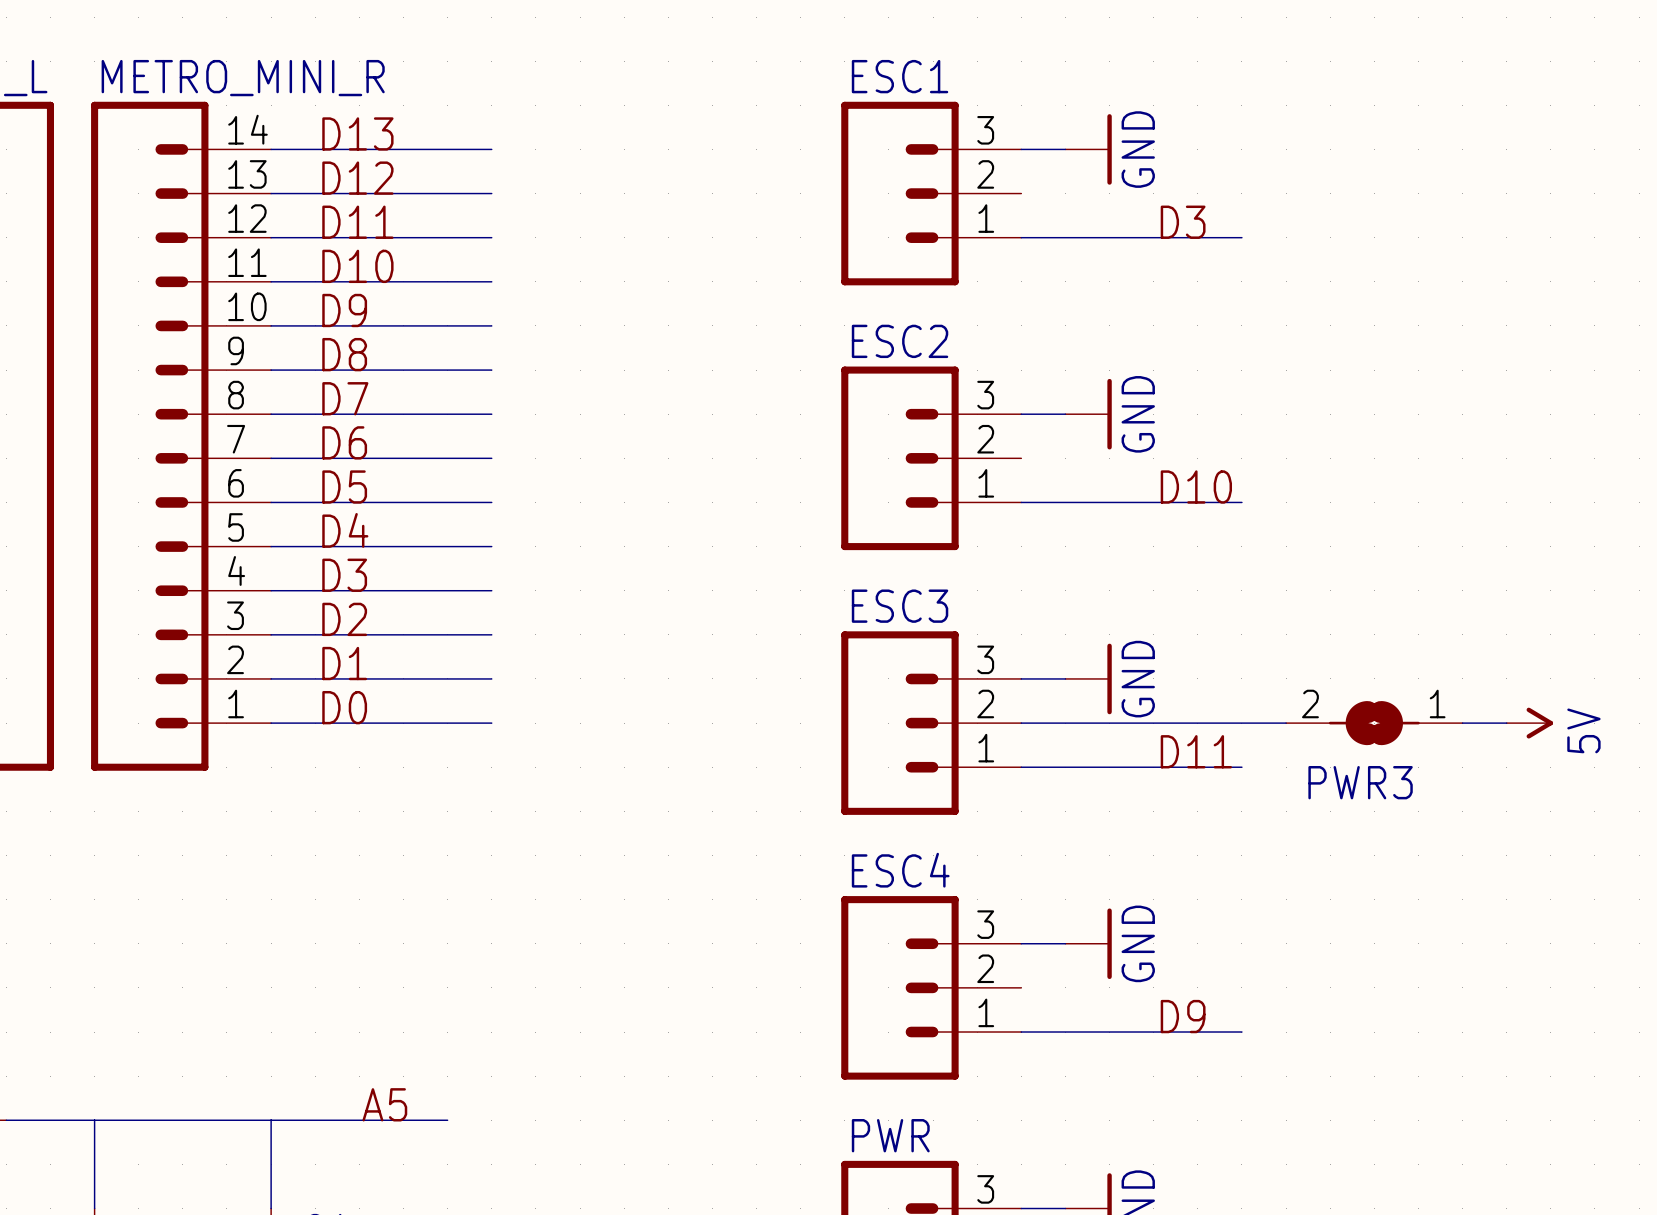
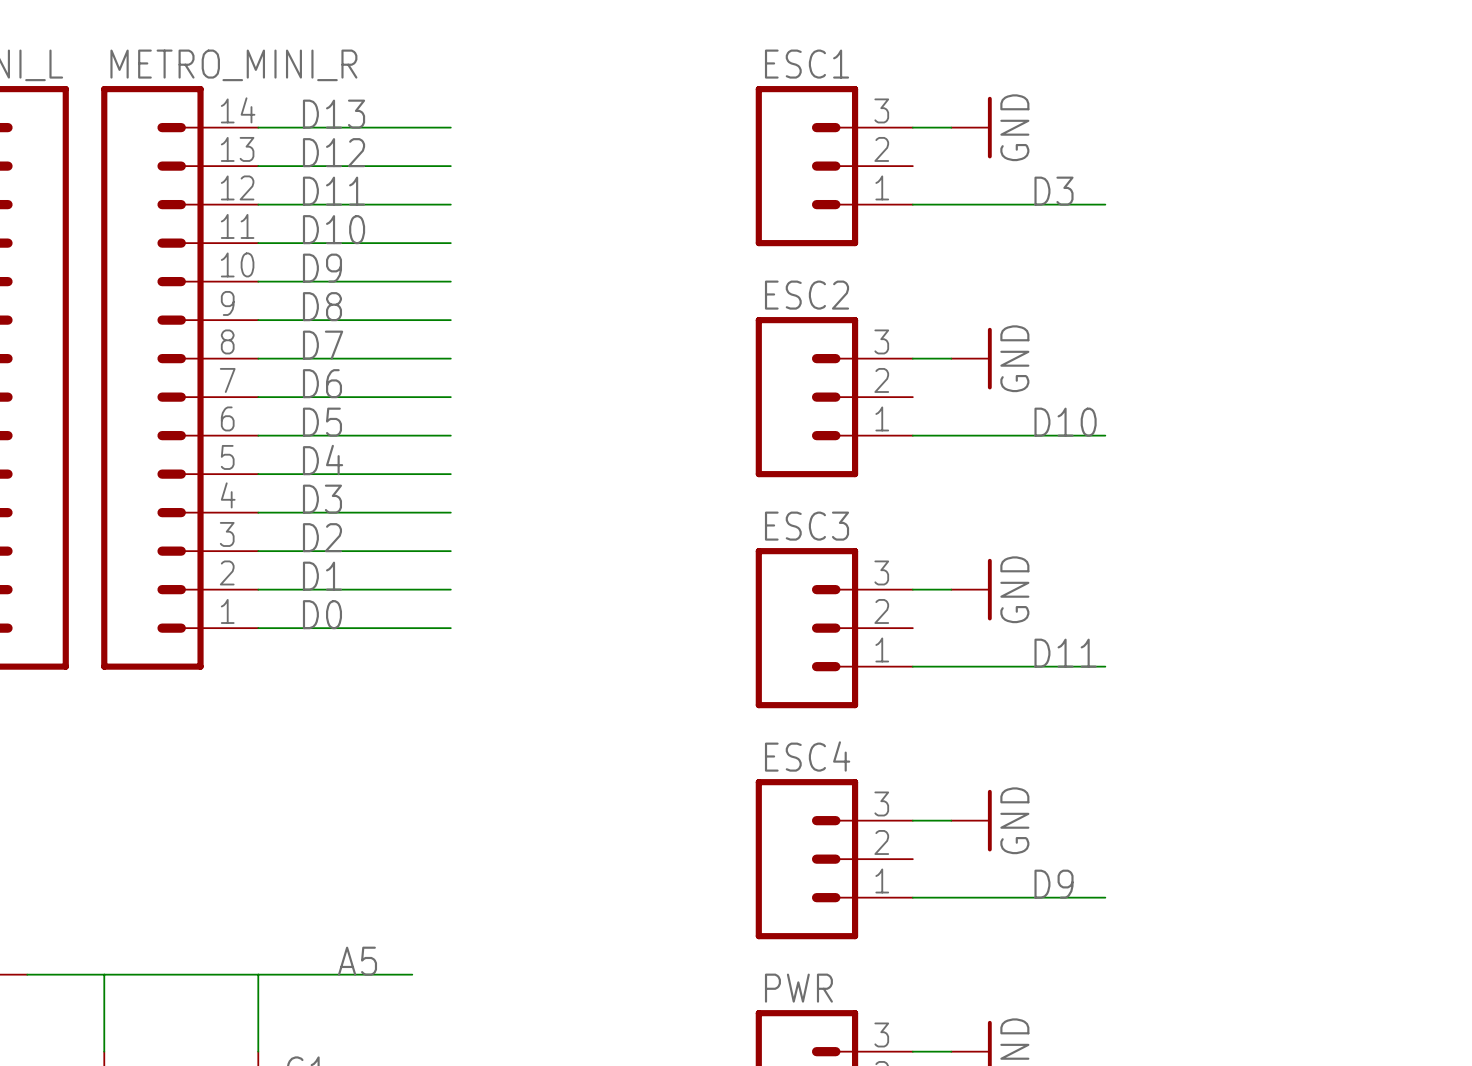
wire: (1021, 723) (1286, 723) -> none
PWR3: (1374, 723) -> none
wire: (1462, 723) (1506, 723) -> none
power symbol: 5V (1529, 723) -> none

